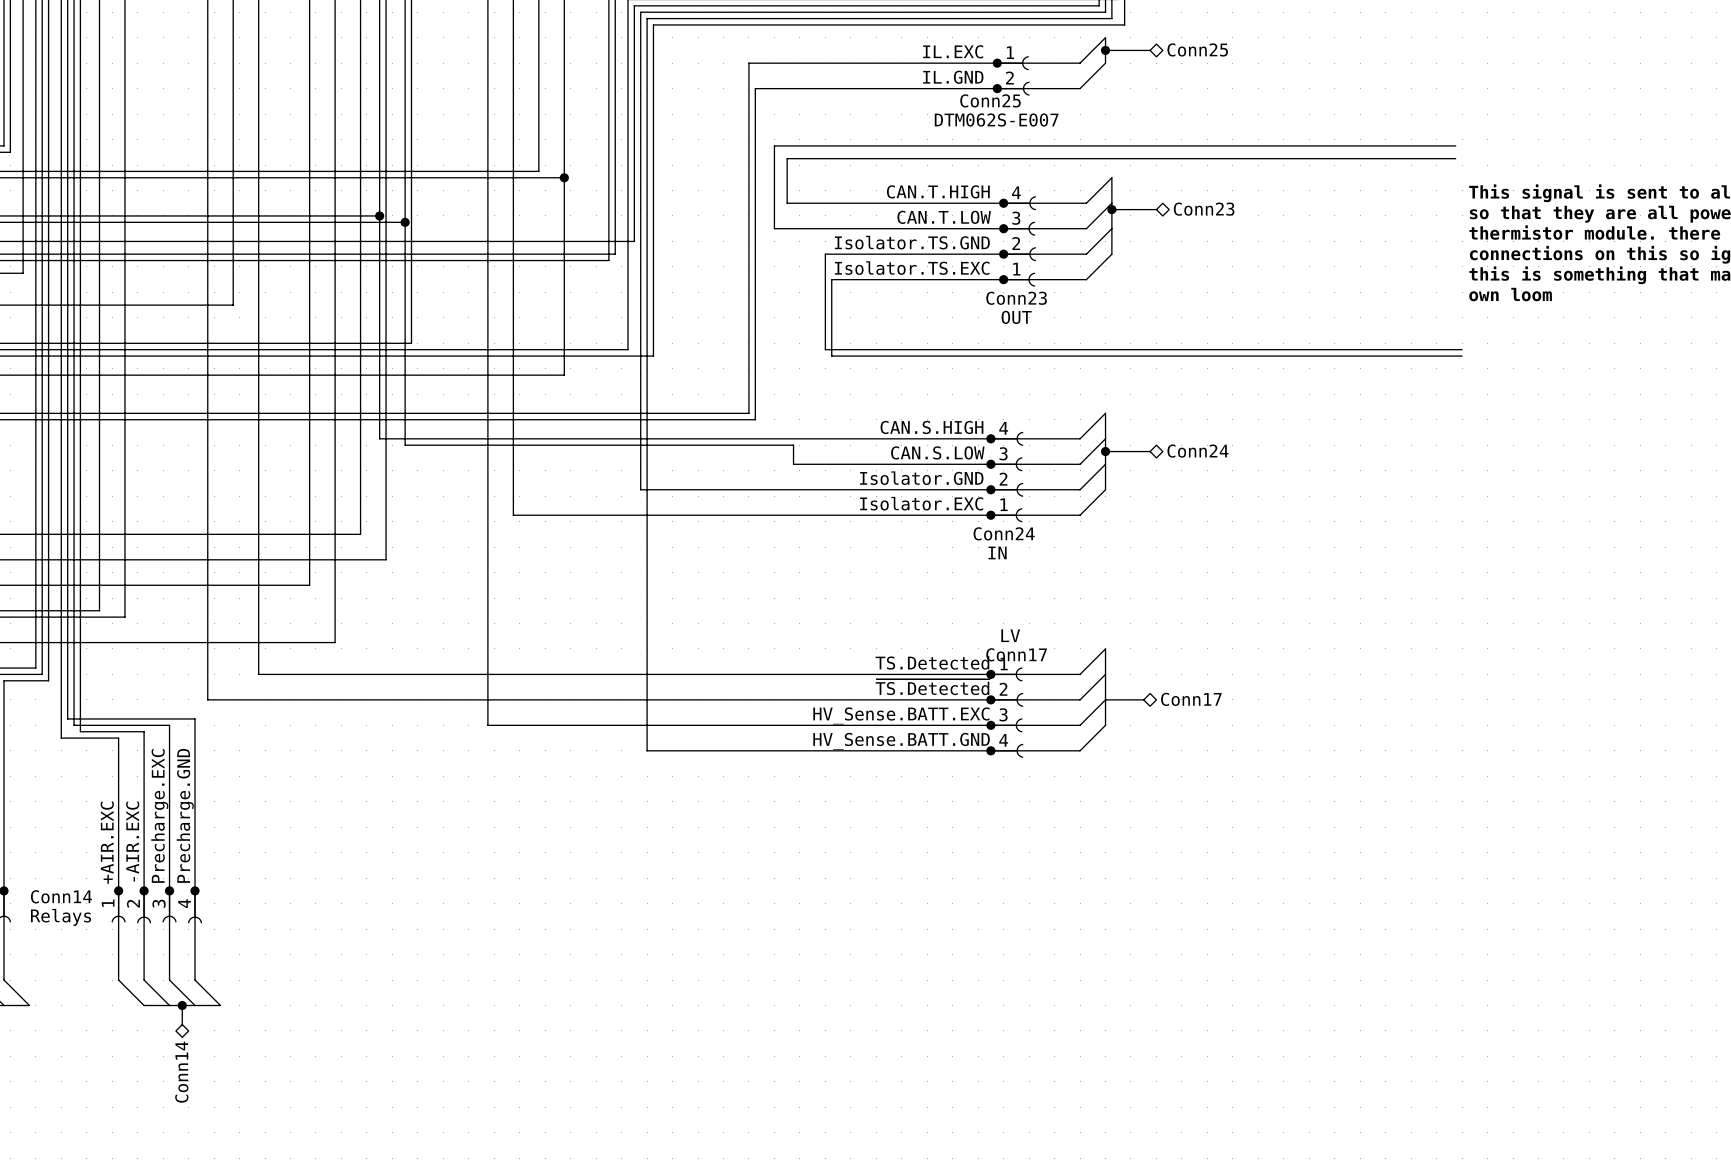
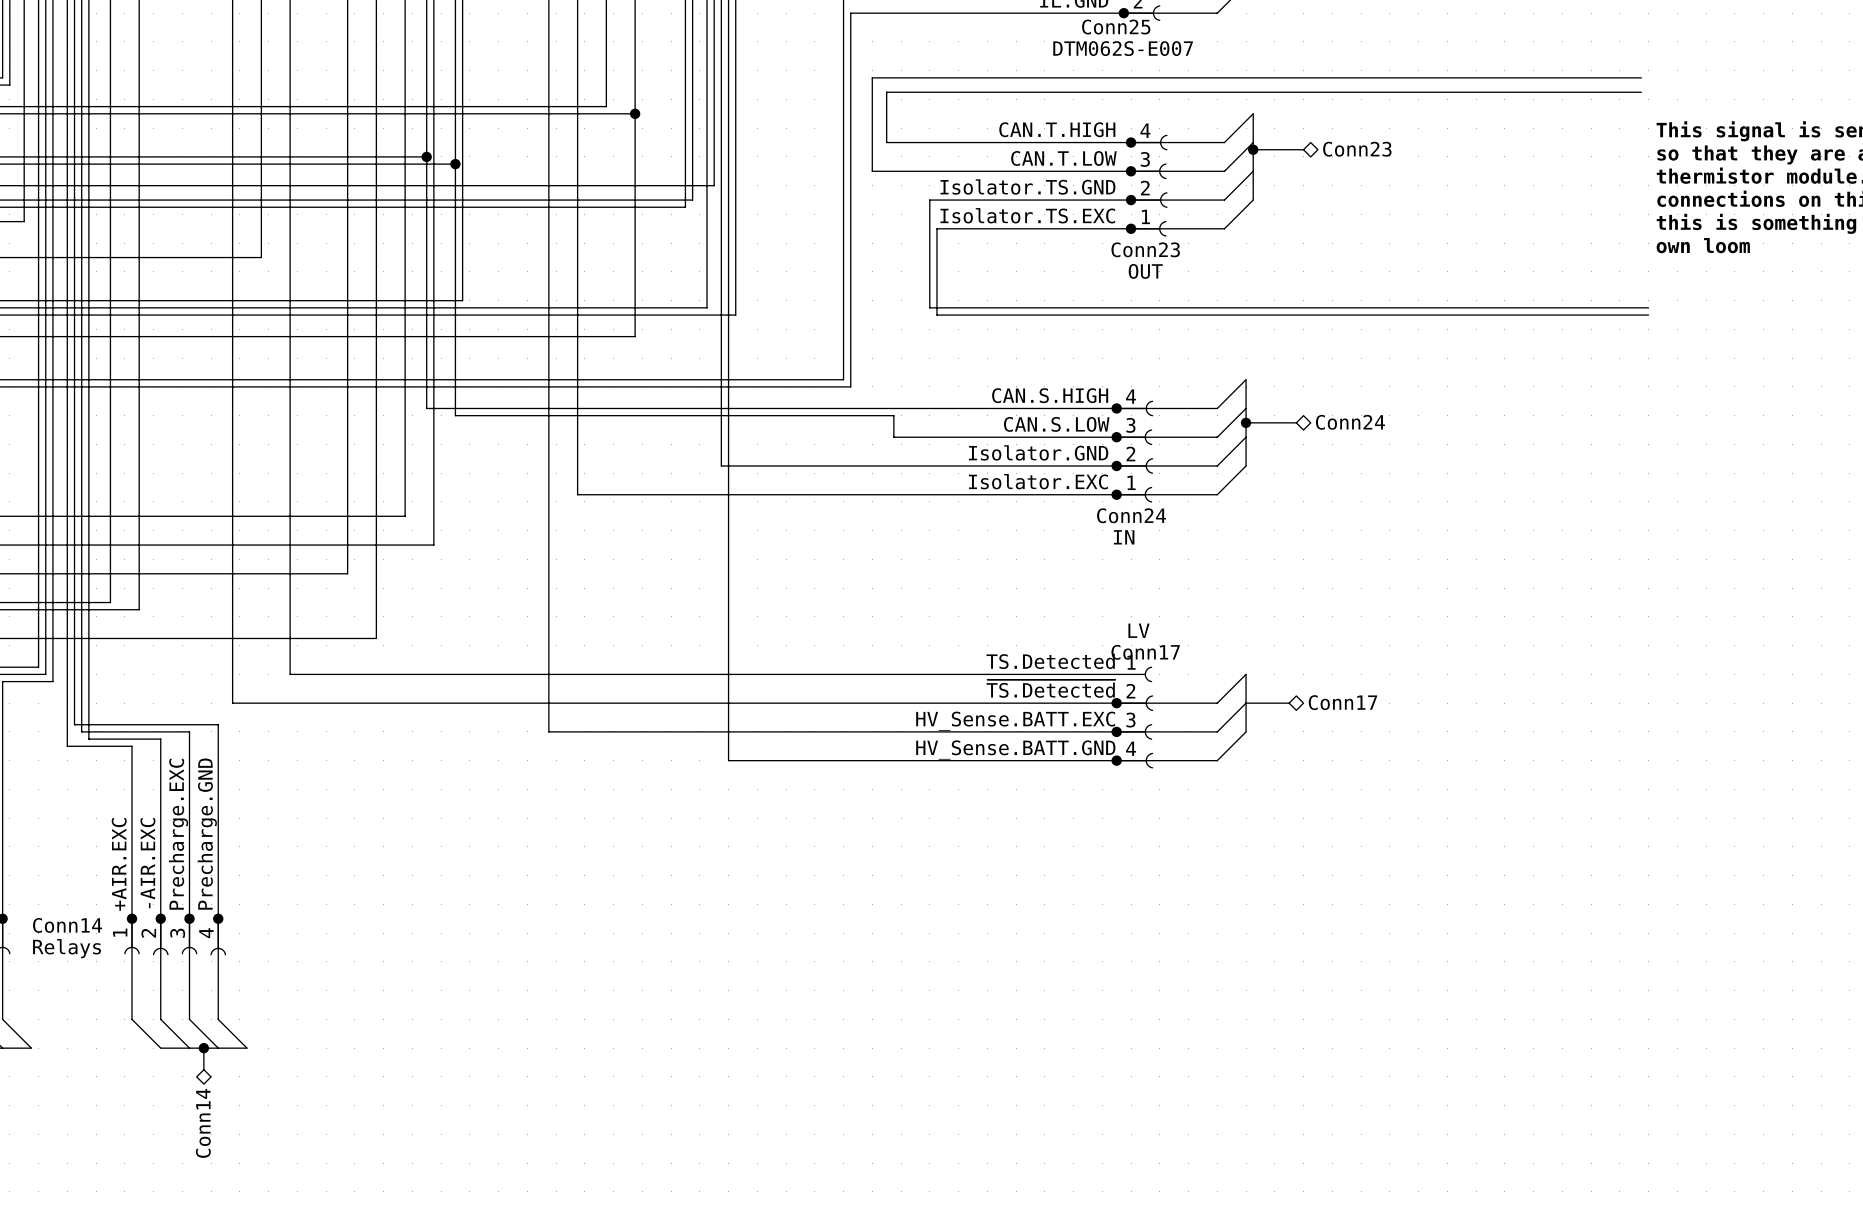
wire: (1105, 648) (1080, 674) (990, 674) -> none
bus: (1105, 648) (1105, 674) -> none
junction: (990, 674) -> none

